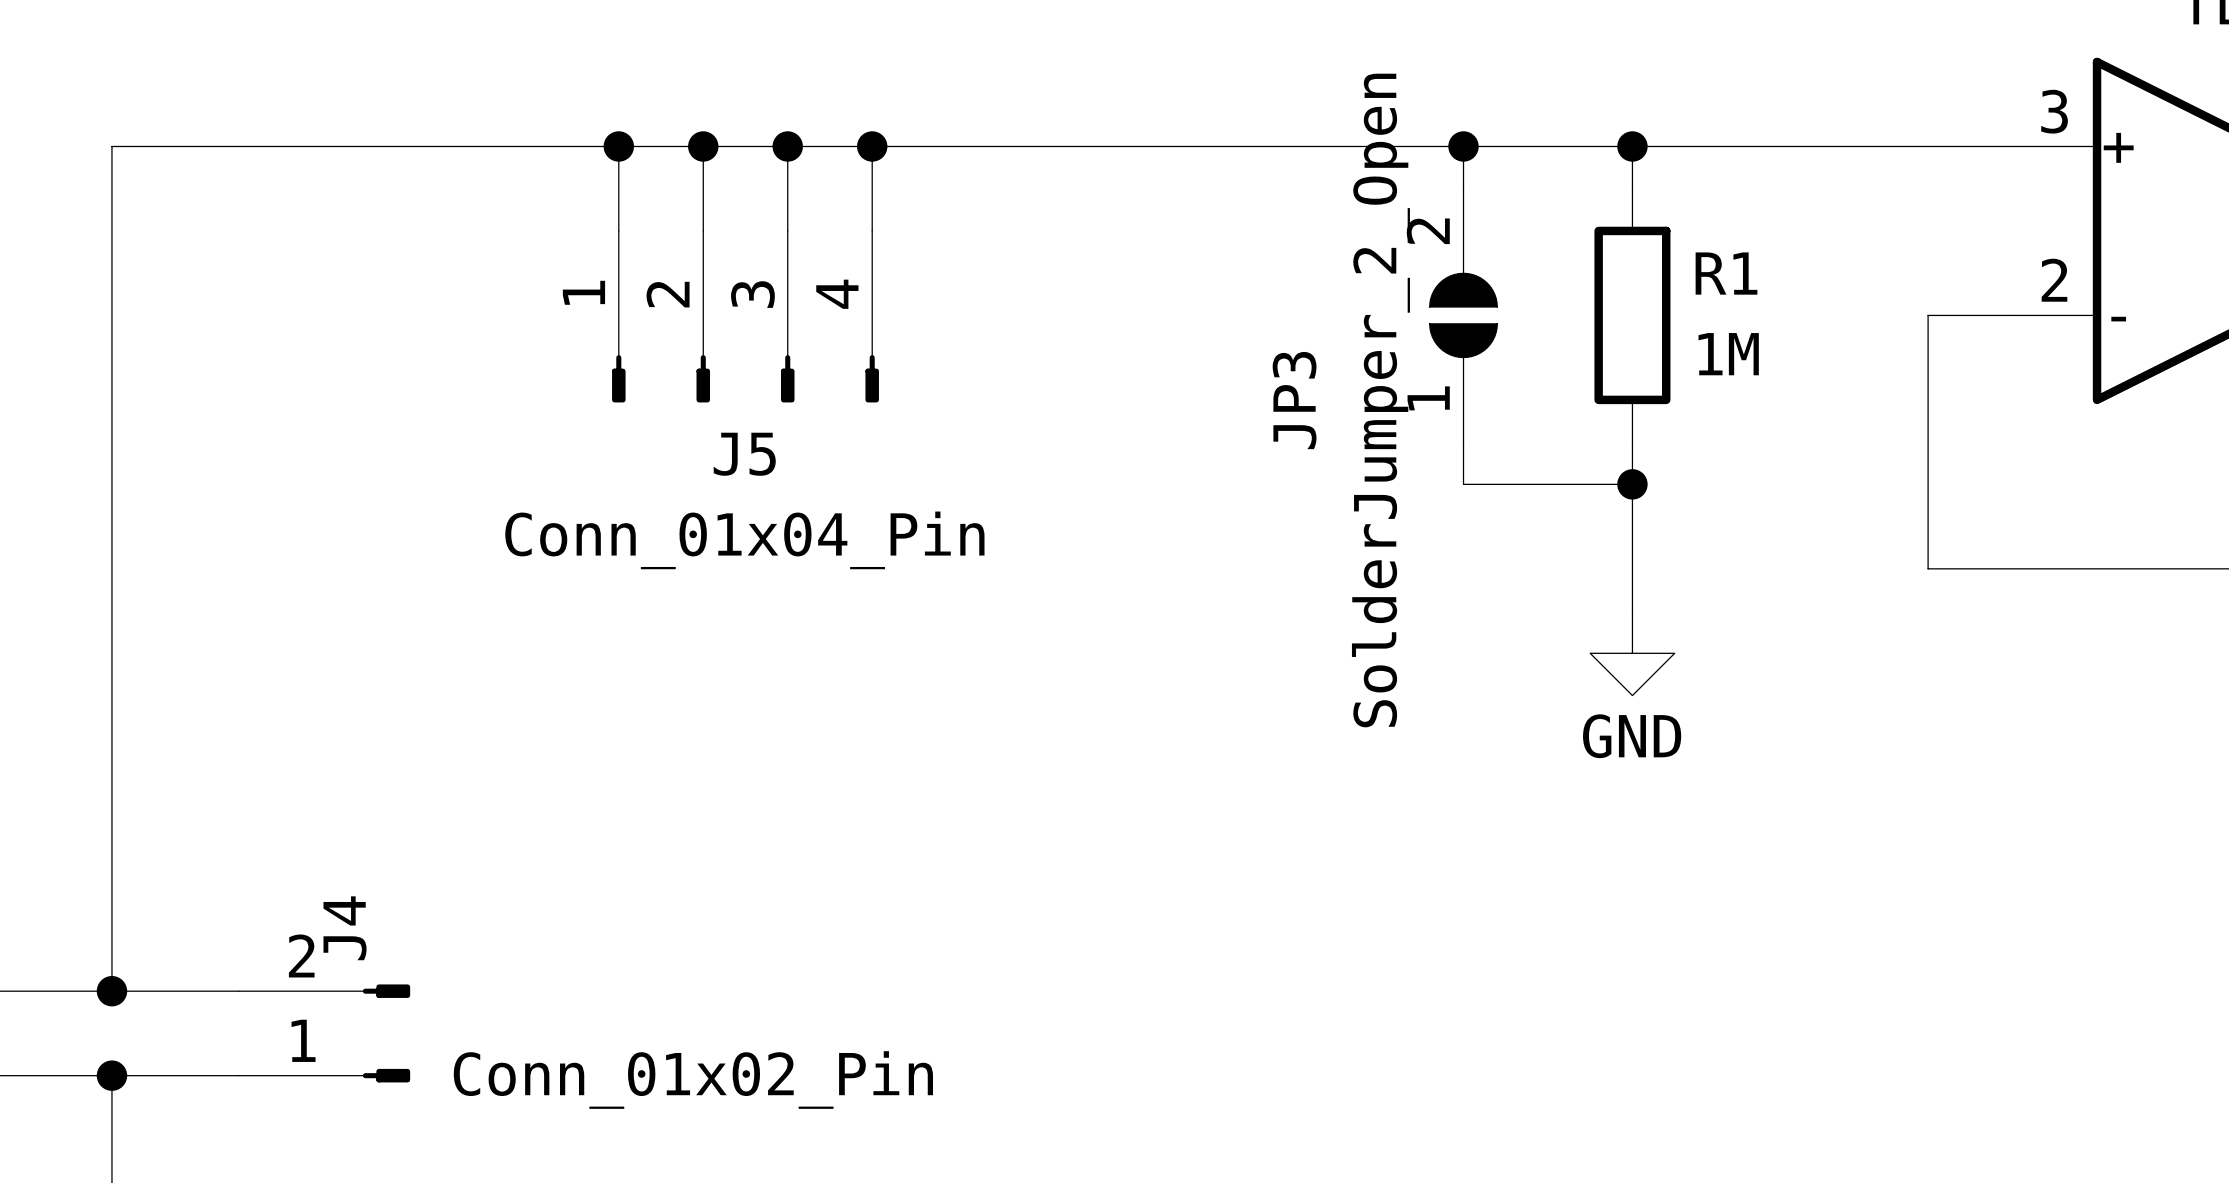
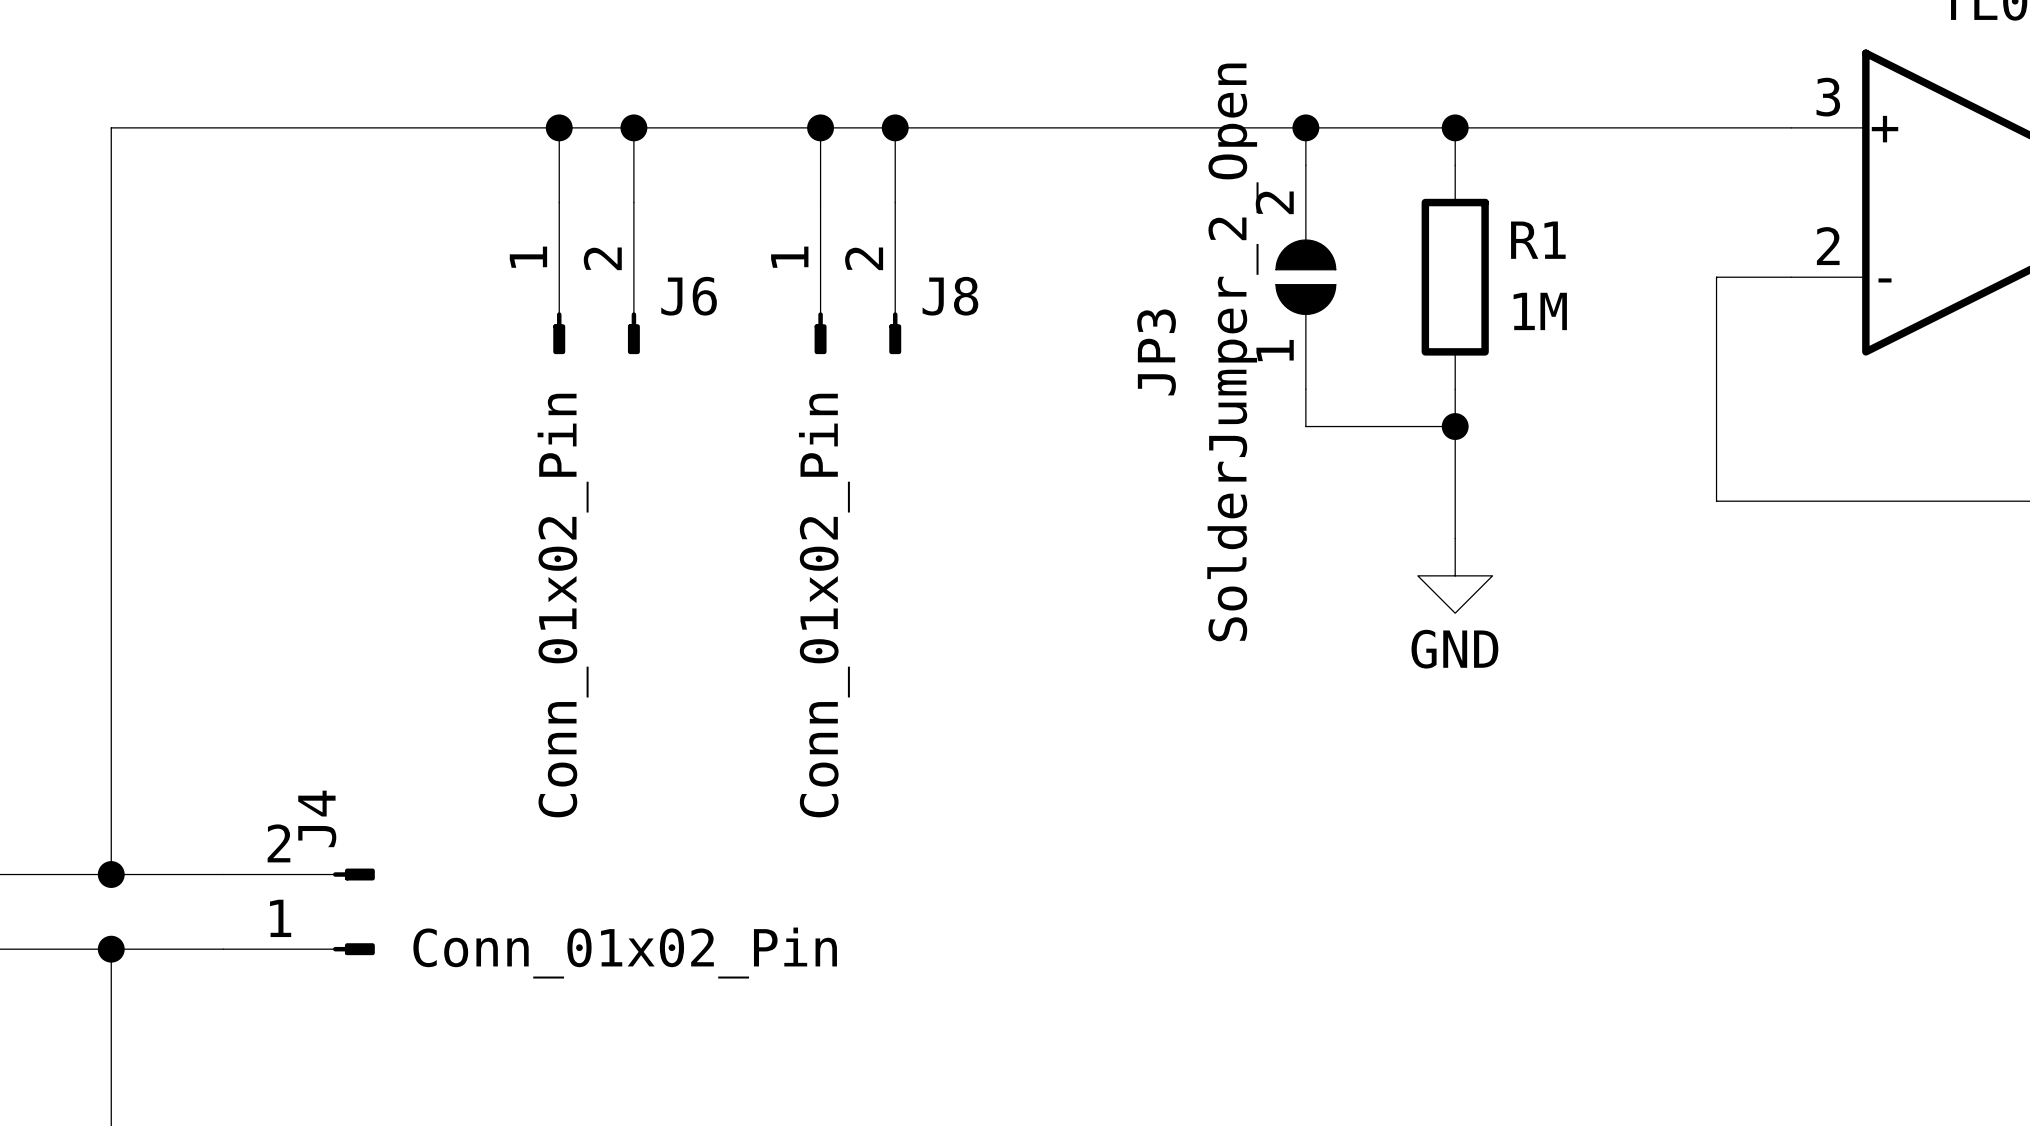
wire: (787, 146) (787, 230) -> (820, 127) (820, 202)
junction: (787, 146) -> none
wire: (872, 146) (872, 230) -> (895, 127) (895, 202)
junction position: (872, 146) -> (820, 127)
junction: none -> (895, 127)
J6: none -> Conn_01x02_Pin (596, 278)
J5: Conn_01x04_Pin (745, 316) -> none
J8: none -> Conn_01x02_Pin (857, 278)

